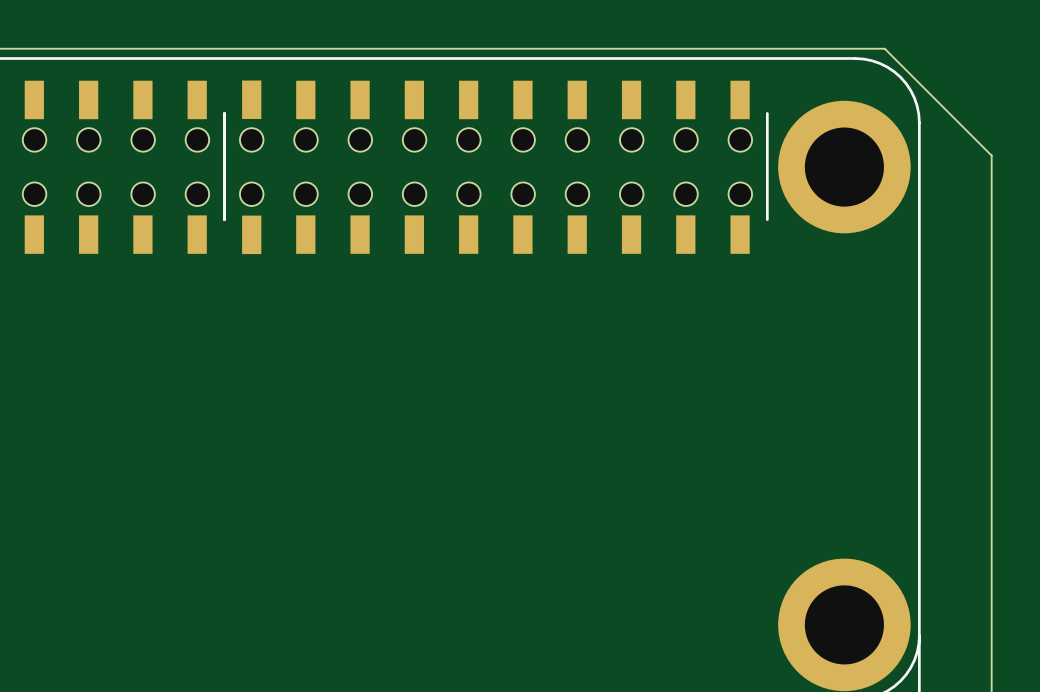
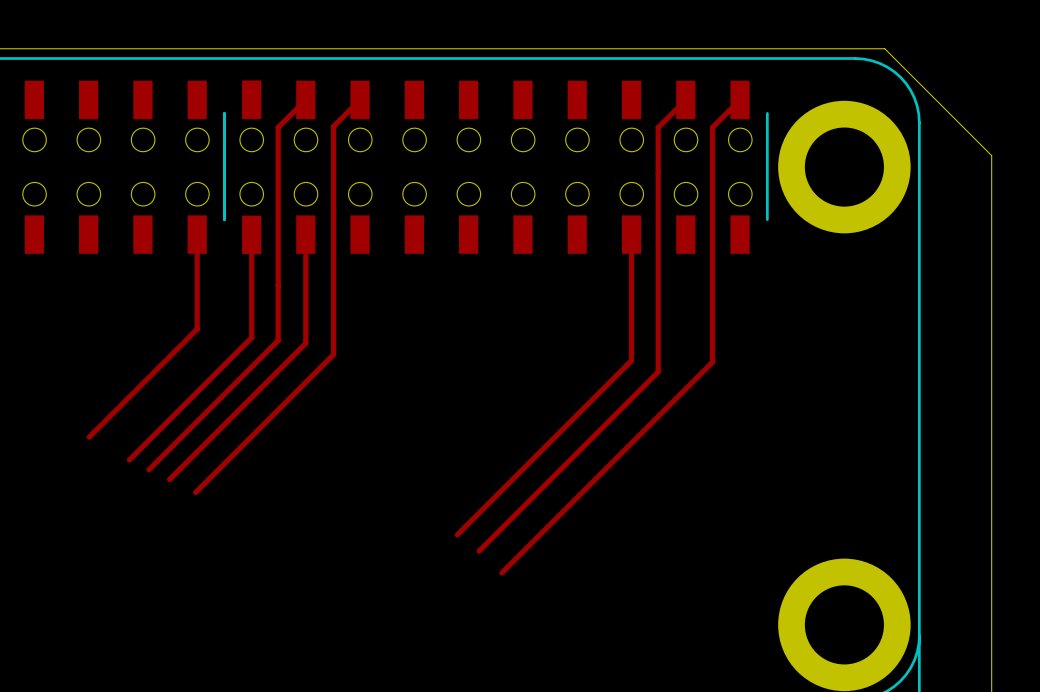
track: none -> (305, 99) (278, 127) (278, 340) (148, 469)
track: none -> (360, 99) (333, 126) (333, 354) (195, 492)
track: none -> (685, 99) (658, 127) (658, 372) (479, 551)
track: none -> (740, 99) (712, 127) (712, 362) (501, 572)
track: none -> (197, 234) (197, 329) (89, 437)
track: none -> (251, 234) (251, 337) (129, 459)
track: none -> (305, 234) (305, 343) (169, 479)
track: none -> (631, 234) (631, 360) (457, 534)

